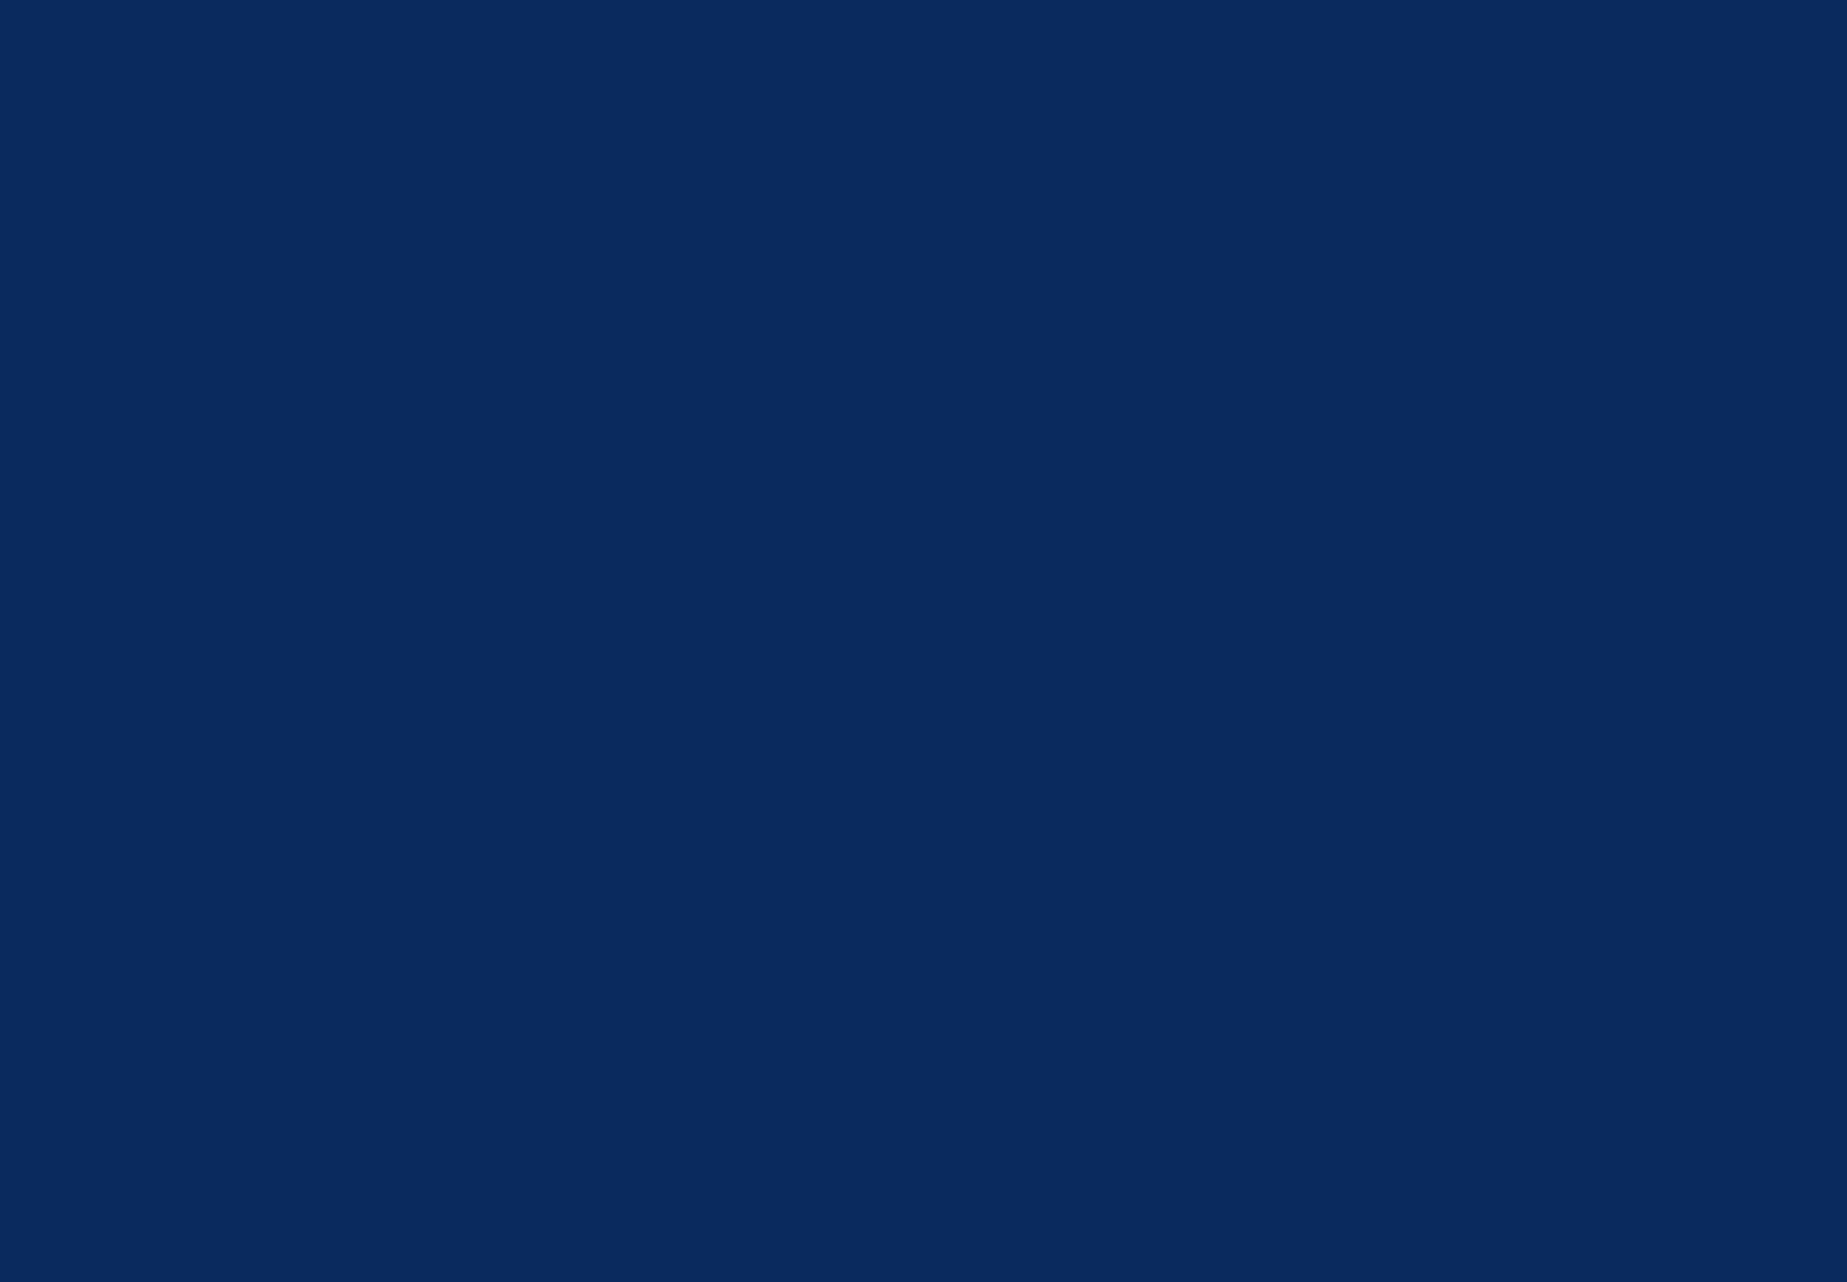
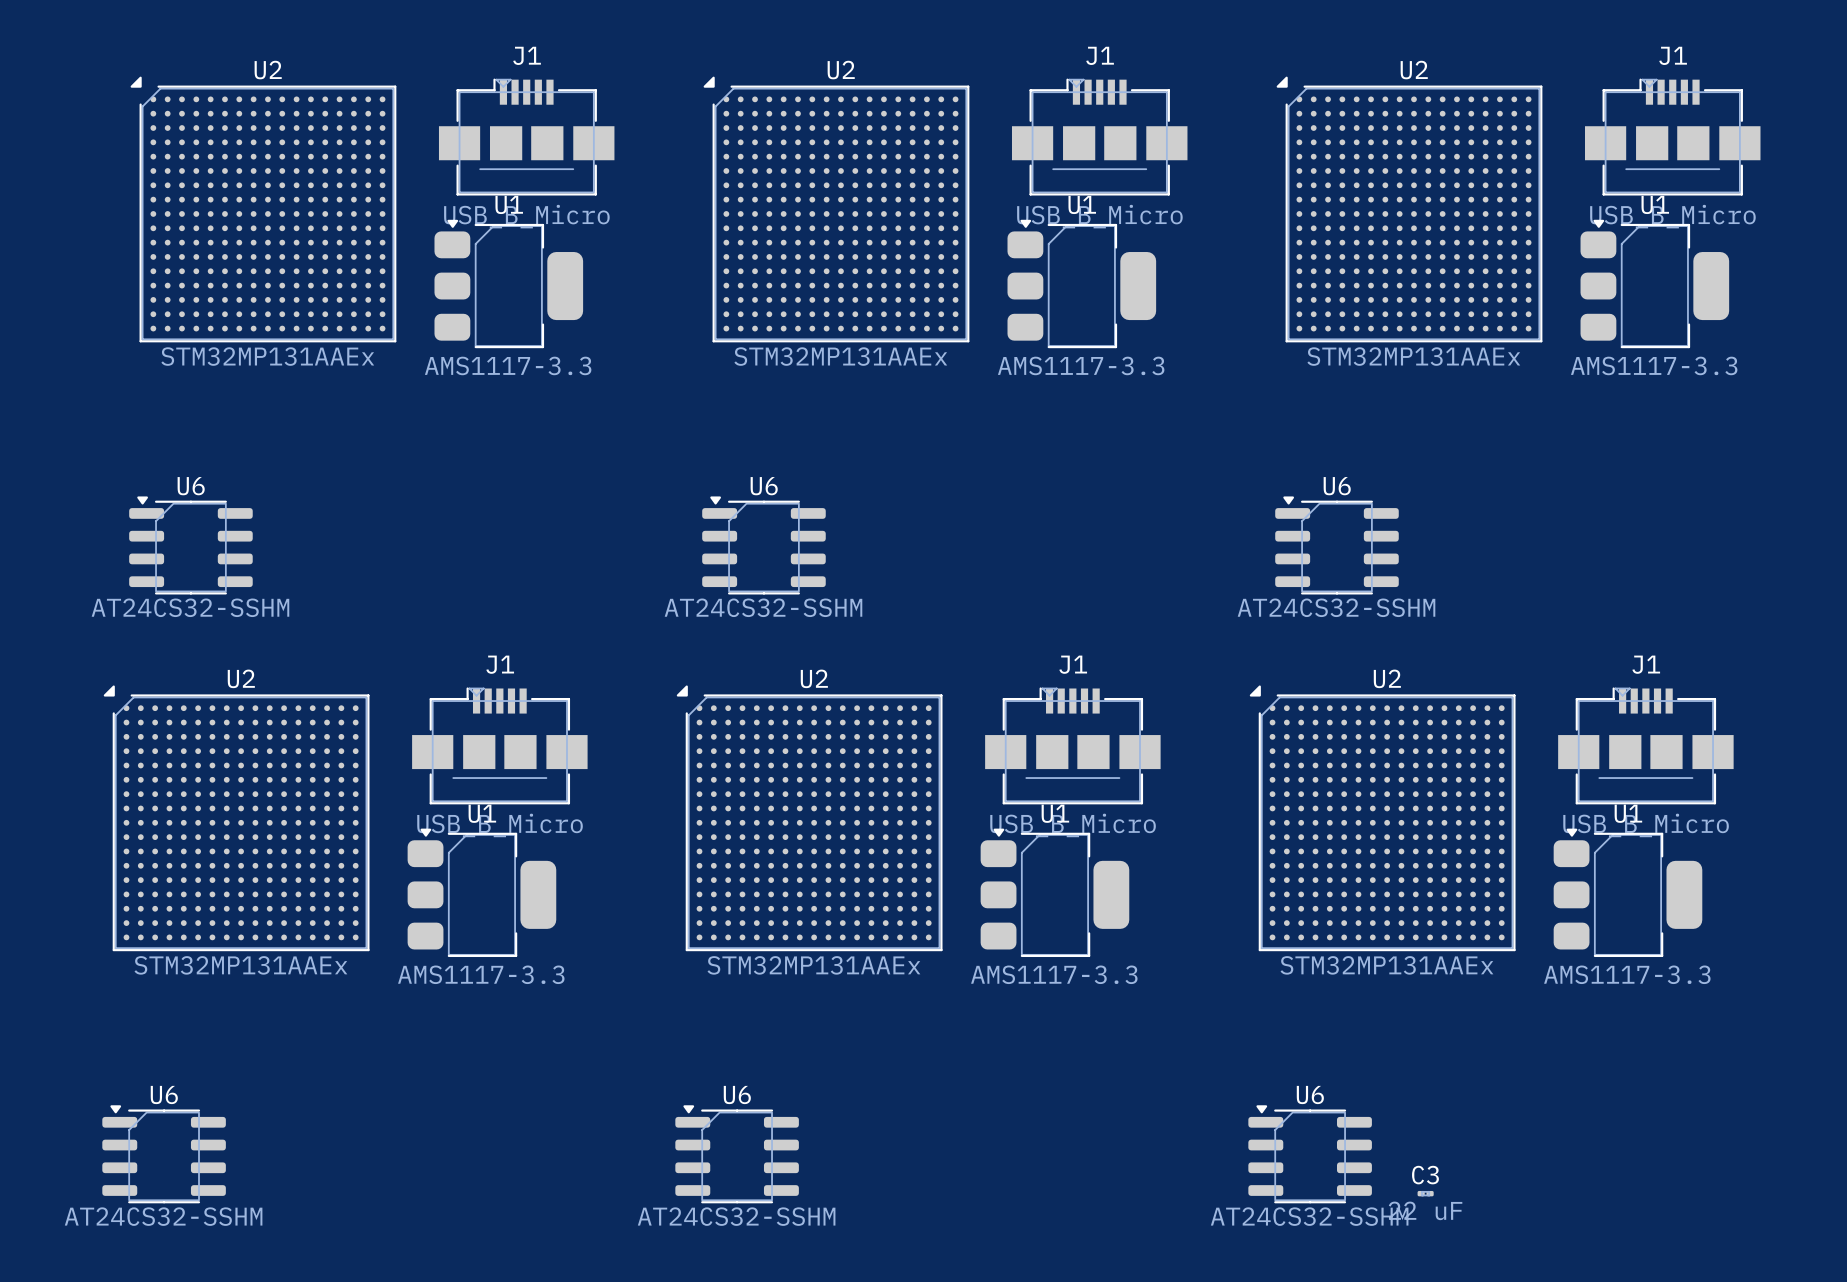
J1: none -> USB_B_Micro (526, 137)
J1: none -> USB_B_Micro (1099, 137)
J1: none -> USB_B_Micro (1672, 137)
U2: none -> STM32MP131AAEx (263, 209)
U2: none -> STM32MP131AAEx (836, 209)
U2: none -> STM32MP131AAEx (1409, 209)
U1: none -> AMS1117-3.3 (508, 283)
U1: none -> AMS1117-3.3 (1081, 283)
U1: none -> AMS1117-3.3 (1654, 283)
U6: none -> AT24CS32-SSHM (190, 545)
U6: none -> AT24CS32-SSHM (763, 545)
U6: none -> AT24CS32-SSHM (1336, 545)
J1: none -> USB_B_Micro (499, 745)
J1: none -> USB_B_Micro (1072, 745)
J1: none -> USB_B_Micro (1645, 745)
U2: none -> STM32MP131AAEx (236, 818)
U2: none -> STM32MP131AAEx (809, 818)
U2: none -> STM32MP131AAEx (1382, 818)
U1: none -> AMS1117-3.3 (481, 892)
U1: none -> AMS1117-3.3 (1054, 892)
U1: none -> AMS1117-3.3 (1627, 892)
U6: none -> AT24CS32-SSHM (164, 1154)
U6: none -> AT24CS32-SSHM (737, 1154)
U6: none -> AT24CS32-SSHM (1310, 1154)
C3: none -> 22 uF (1425, 1193)

